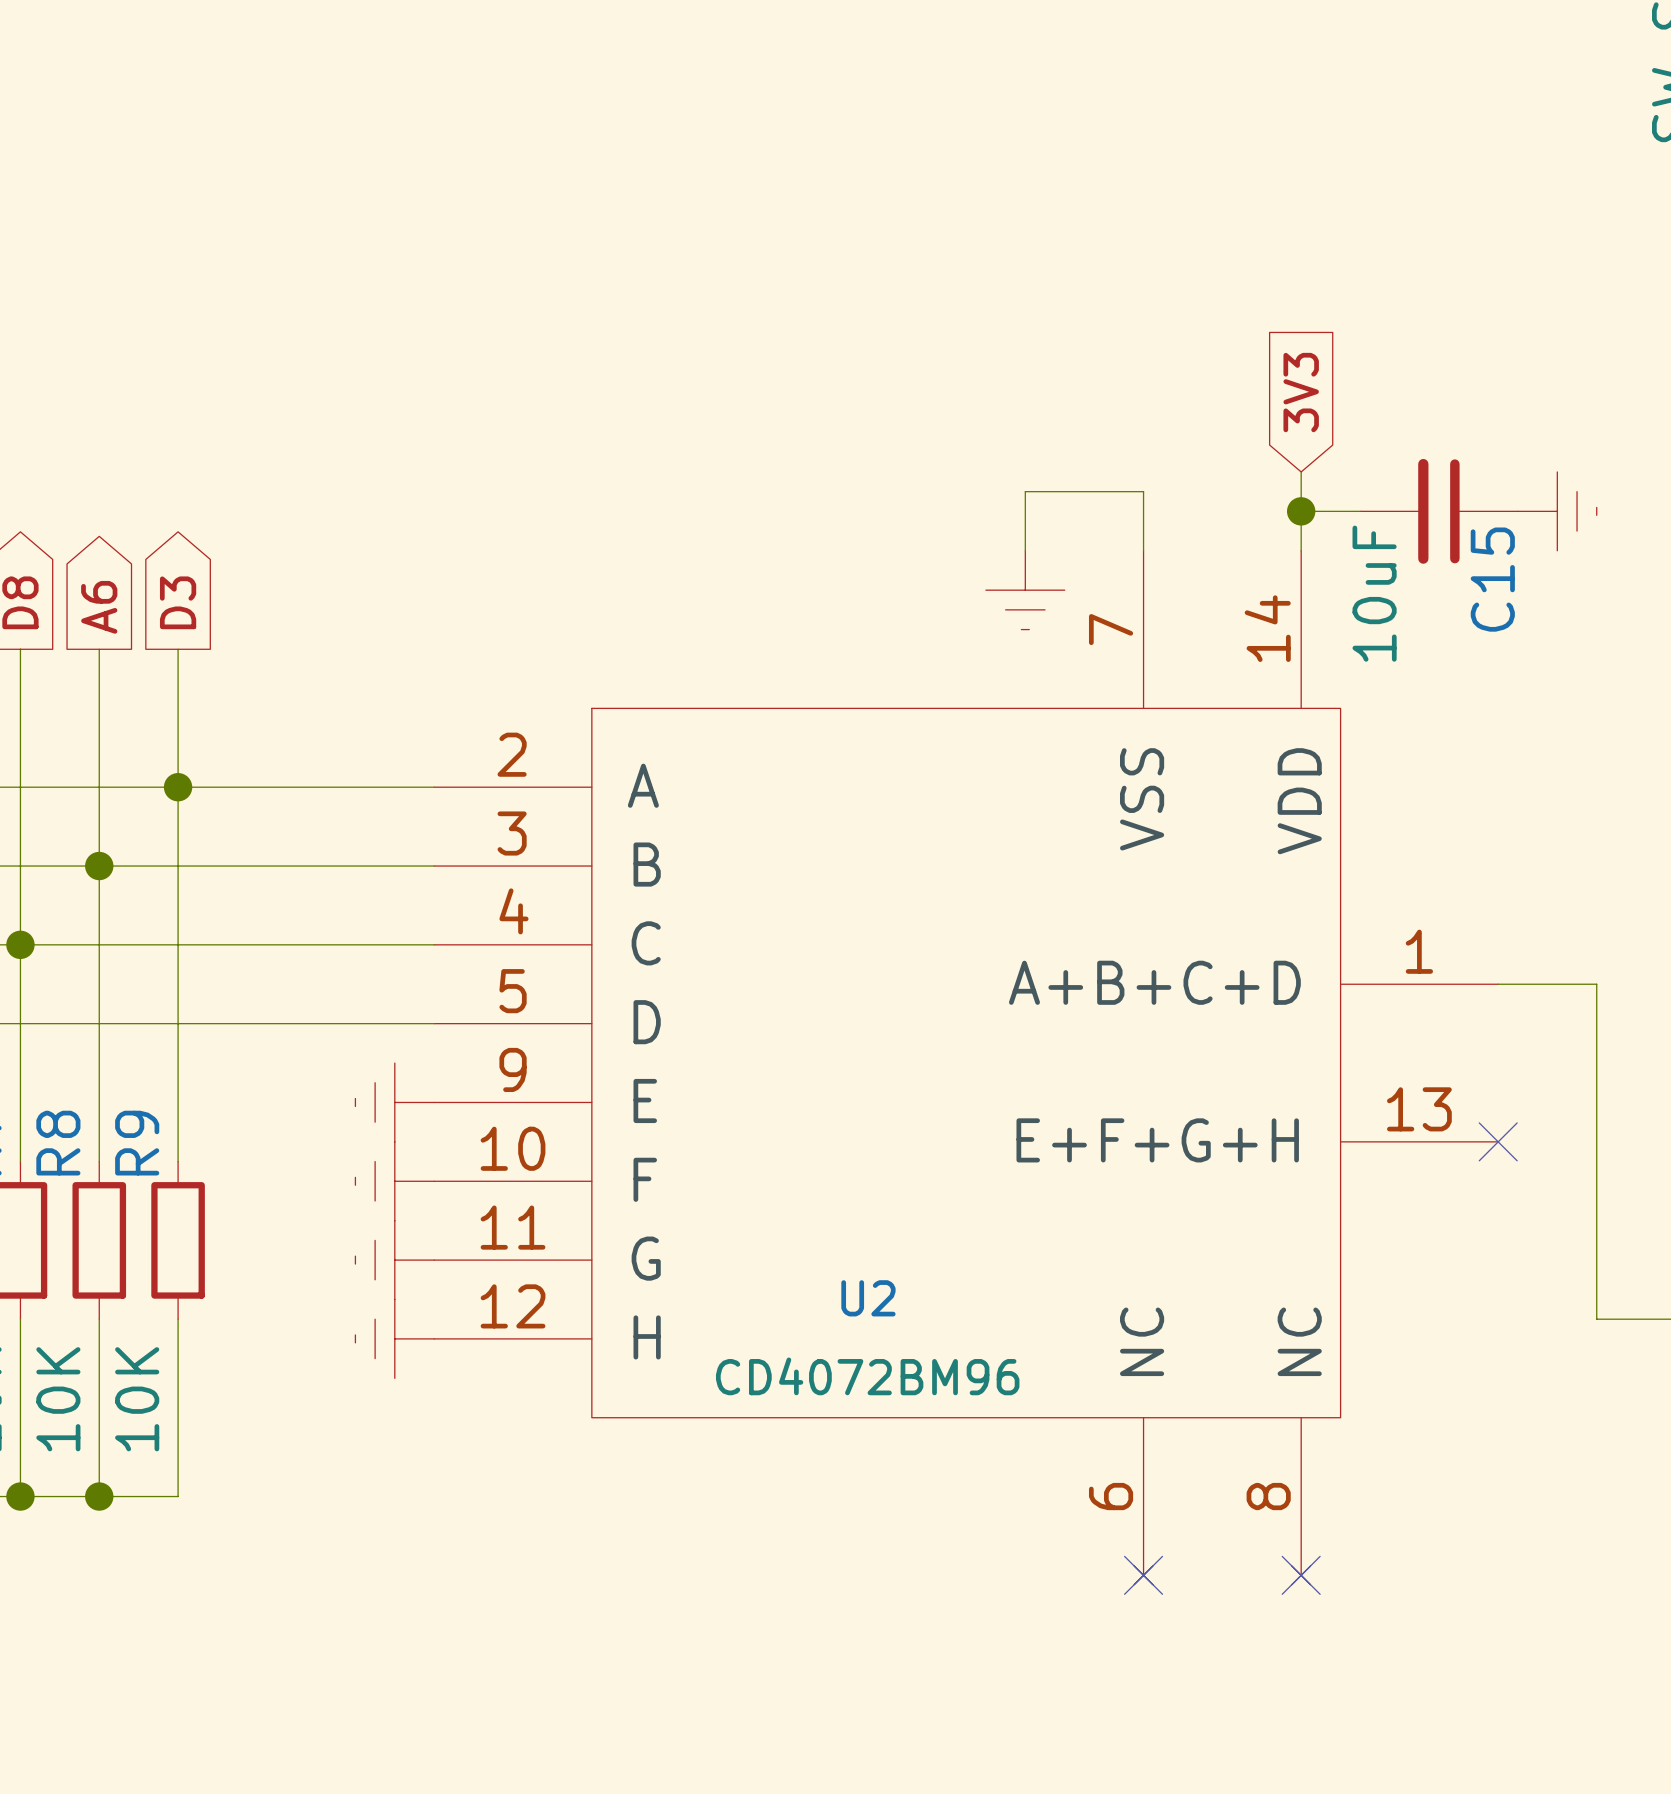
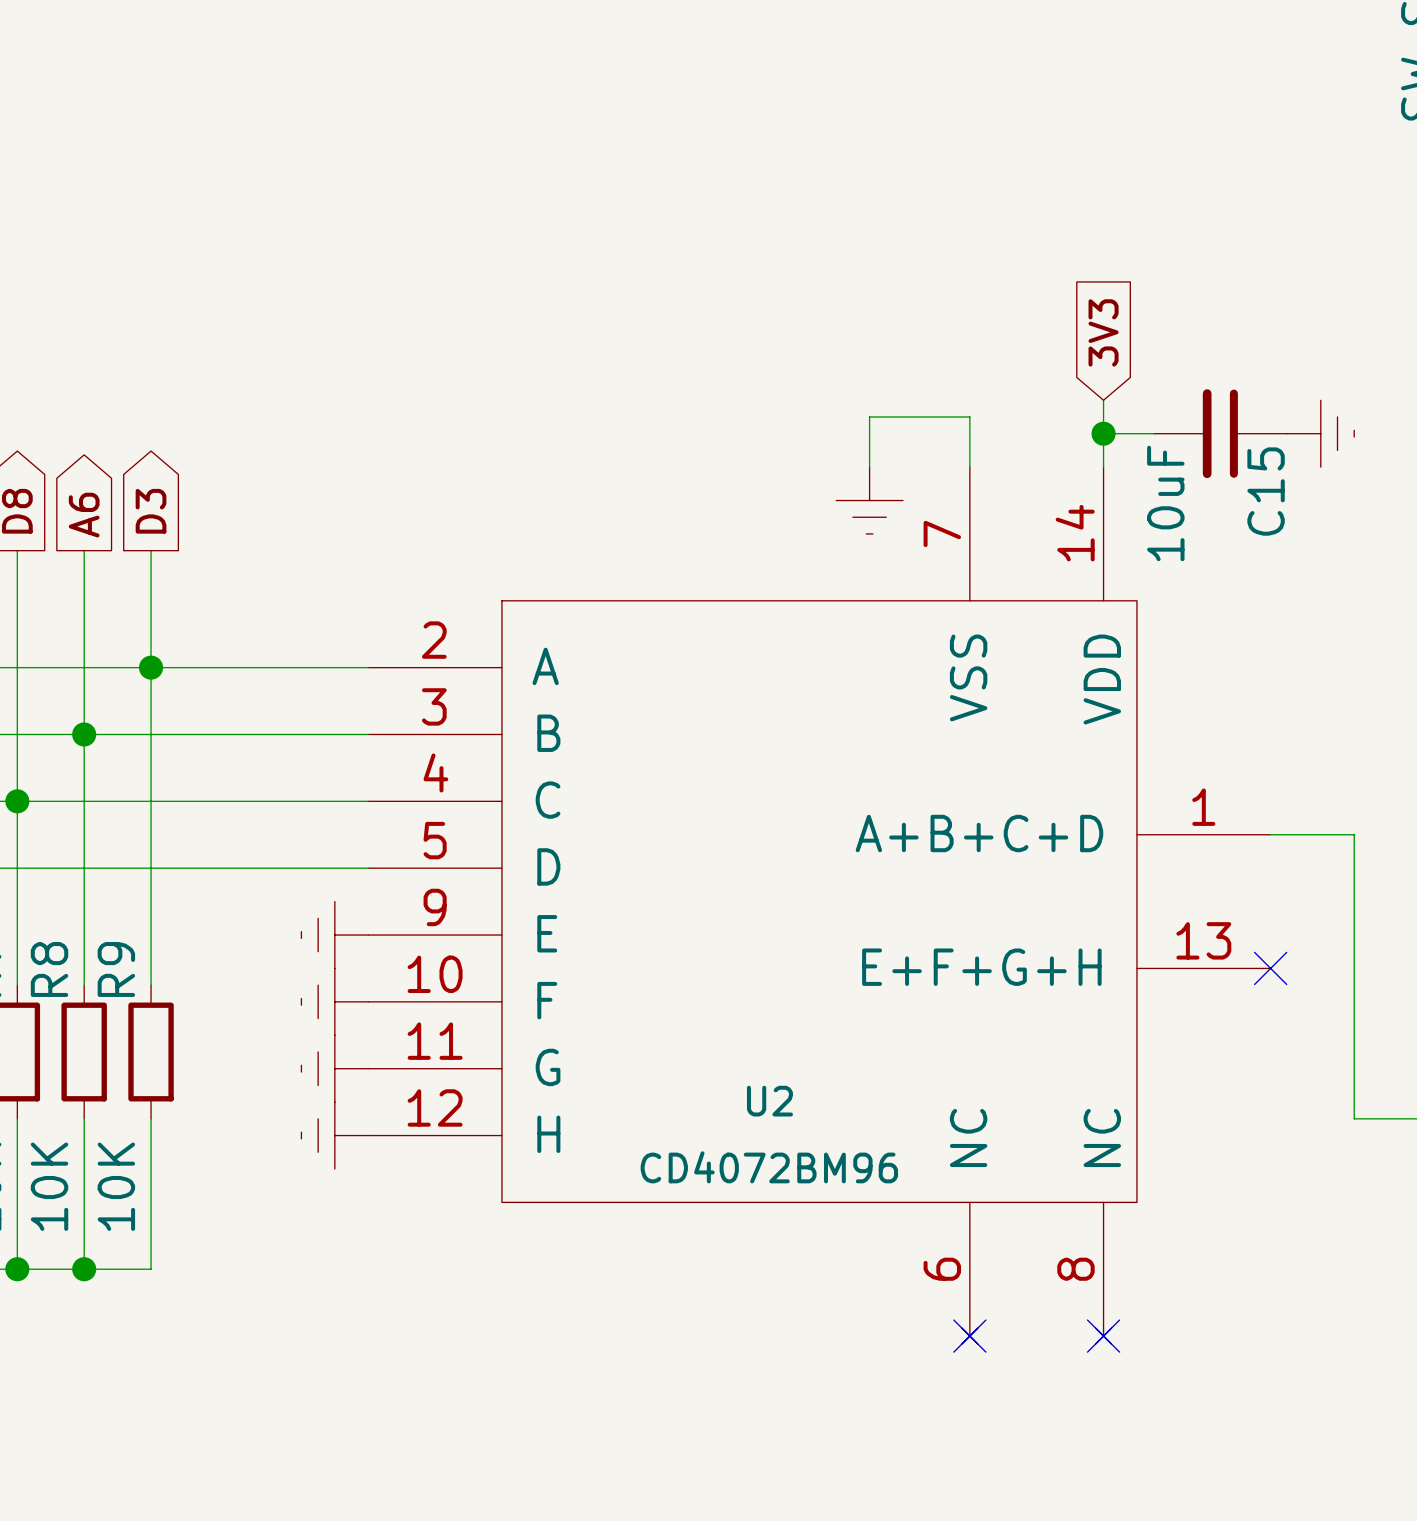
U2 name position: U2 (868, 1298) -> U2 (769, 1101)
U2 value position: CD4072BM96 (867, 1376) -> CD4072BM96 (769, 1167)

